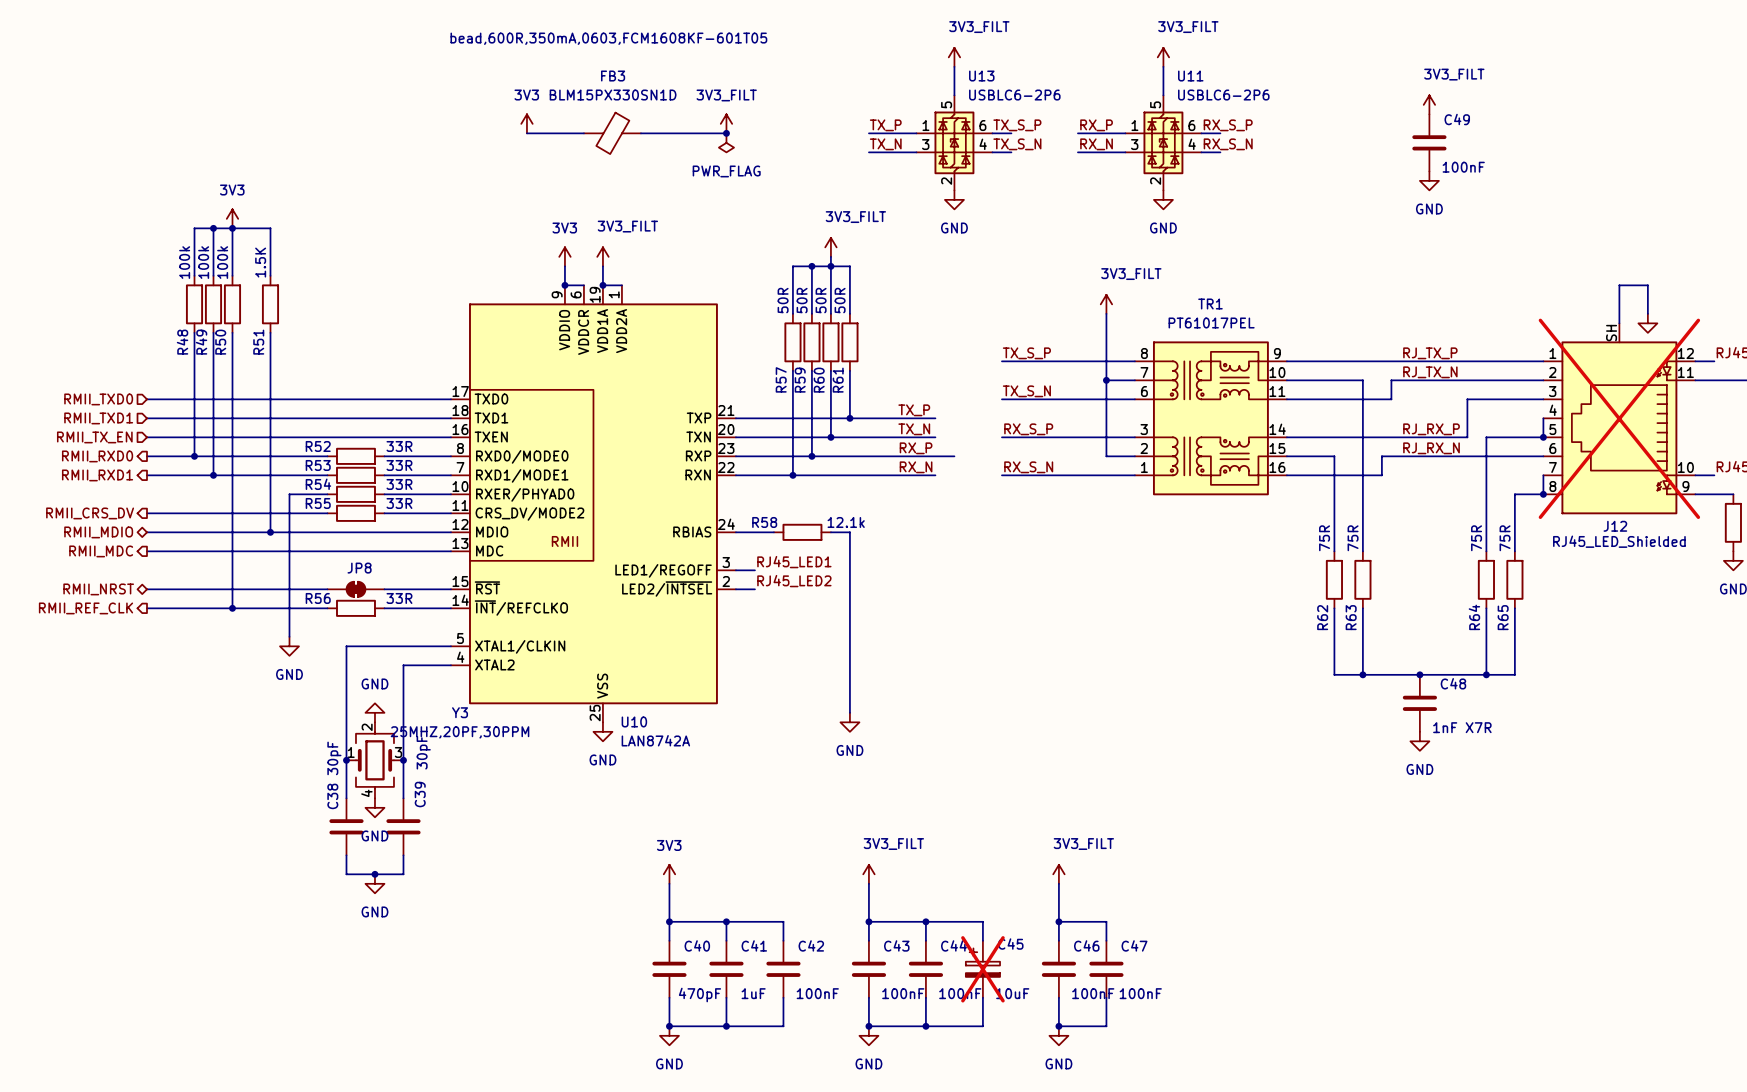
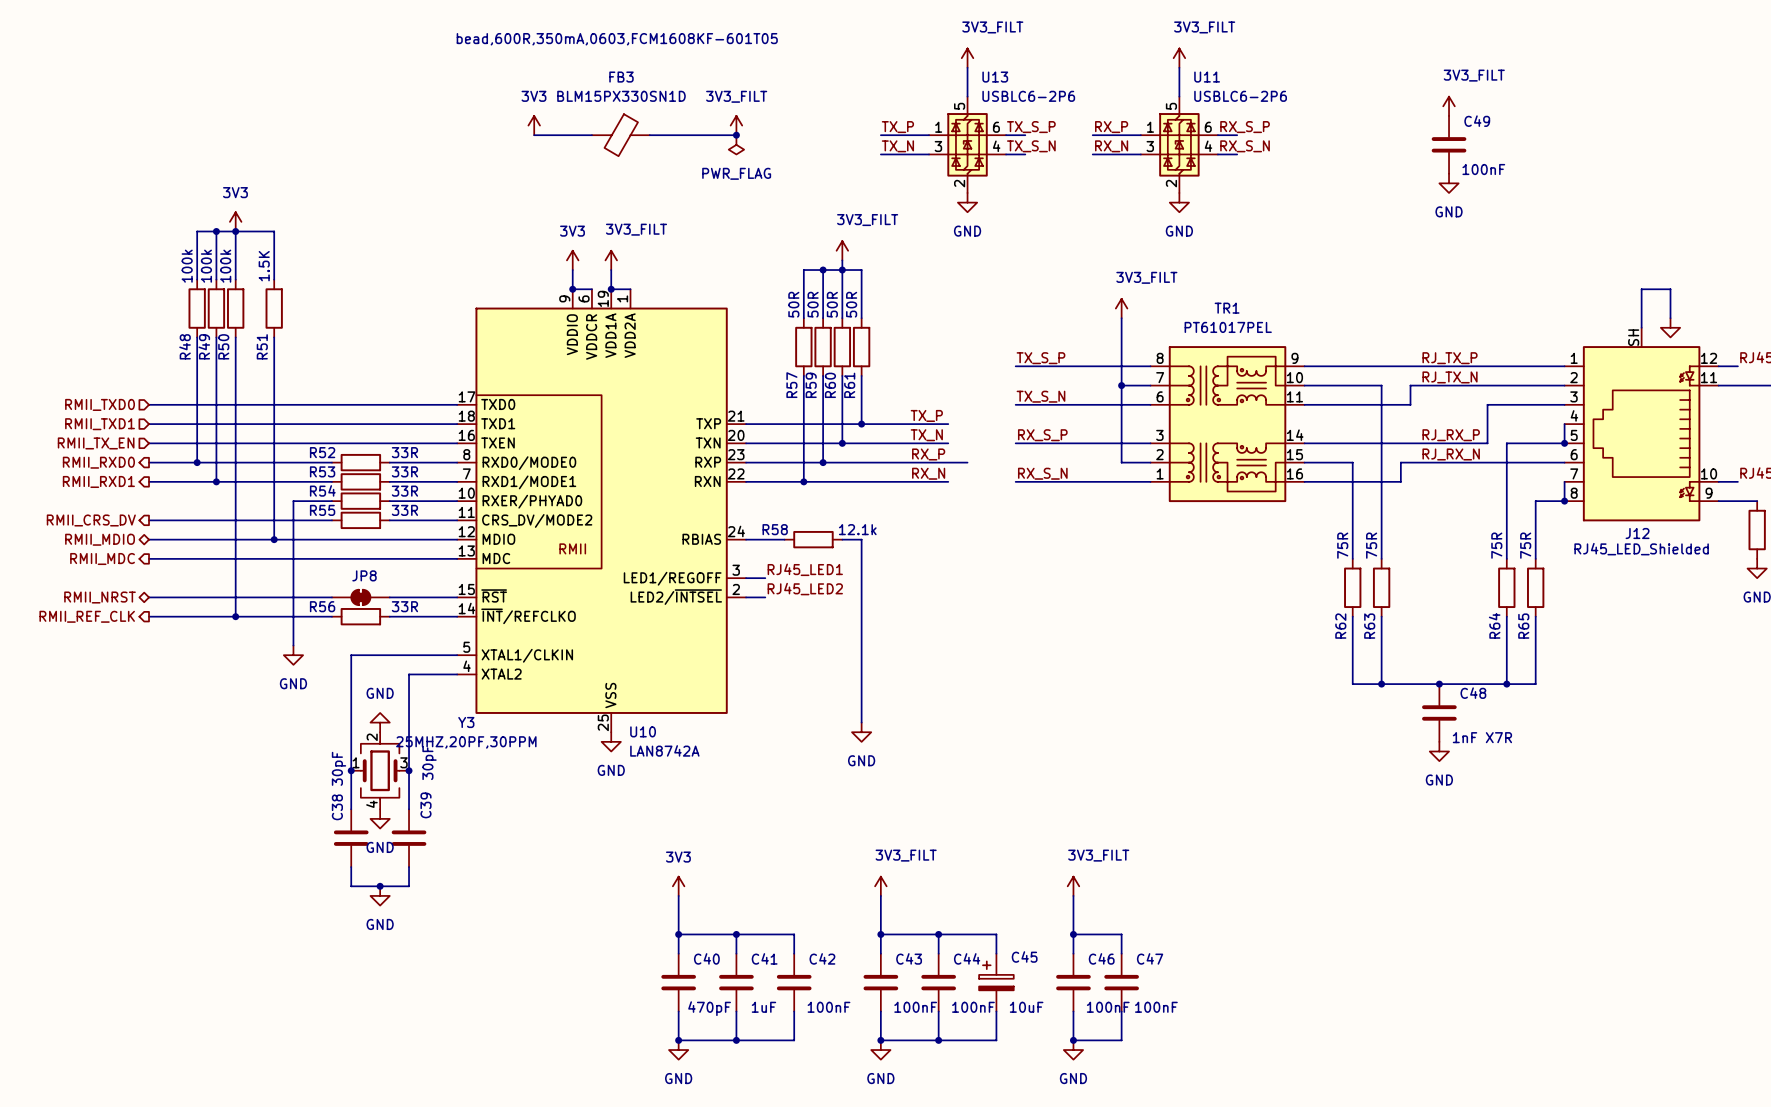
J12 do-not-place cross: (1619, 418) -> none
C45 do-not-place cross: (982, 969) -> none

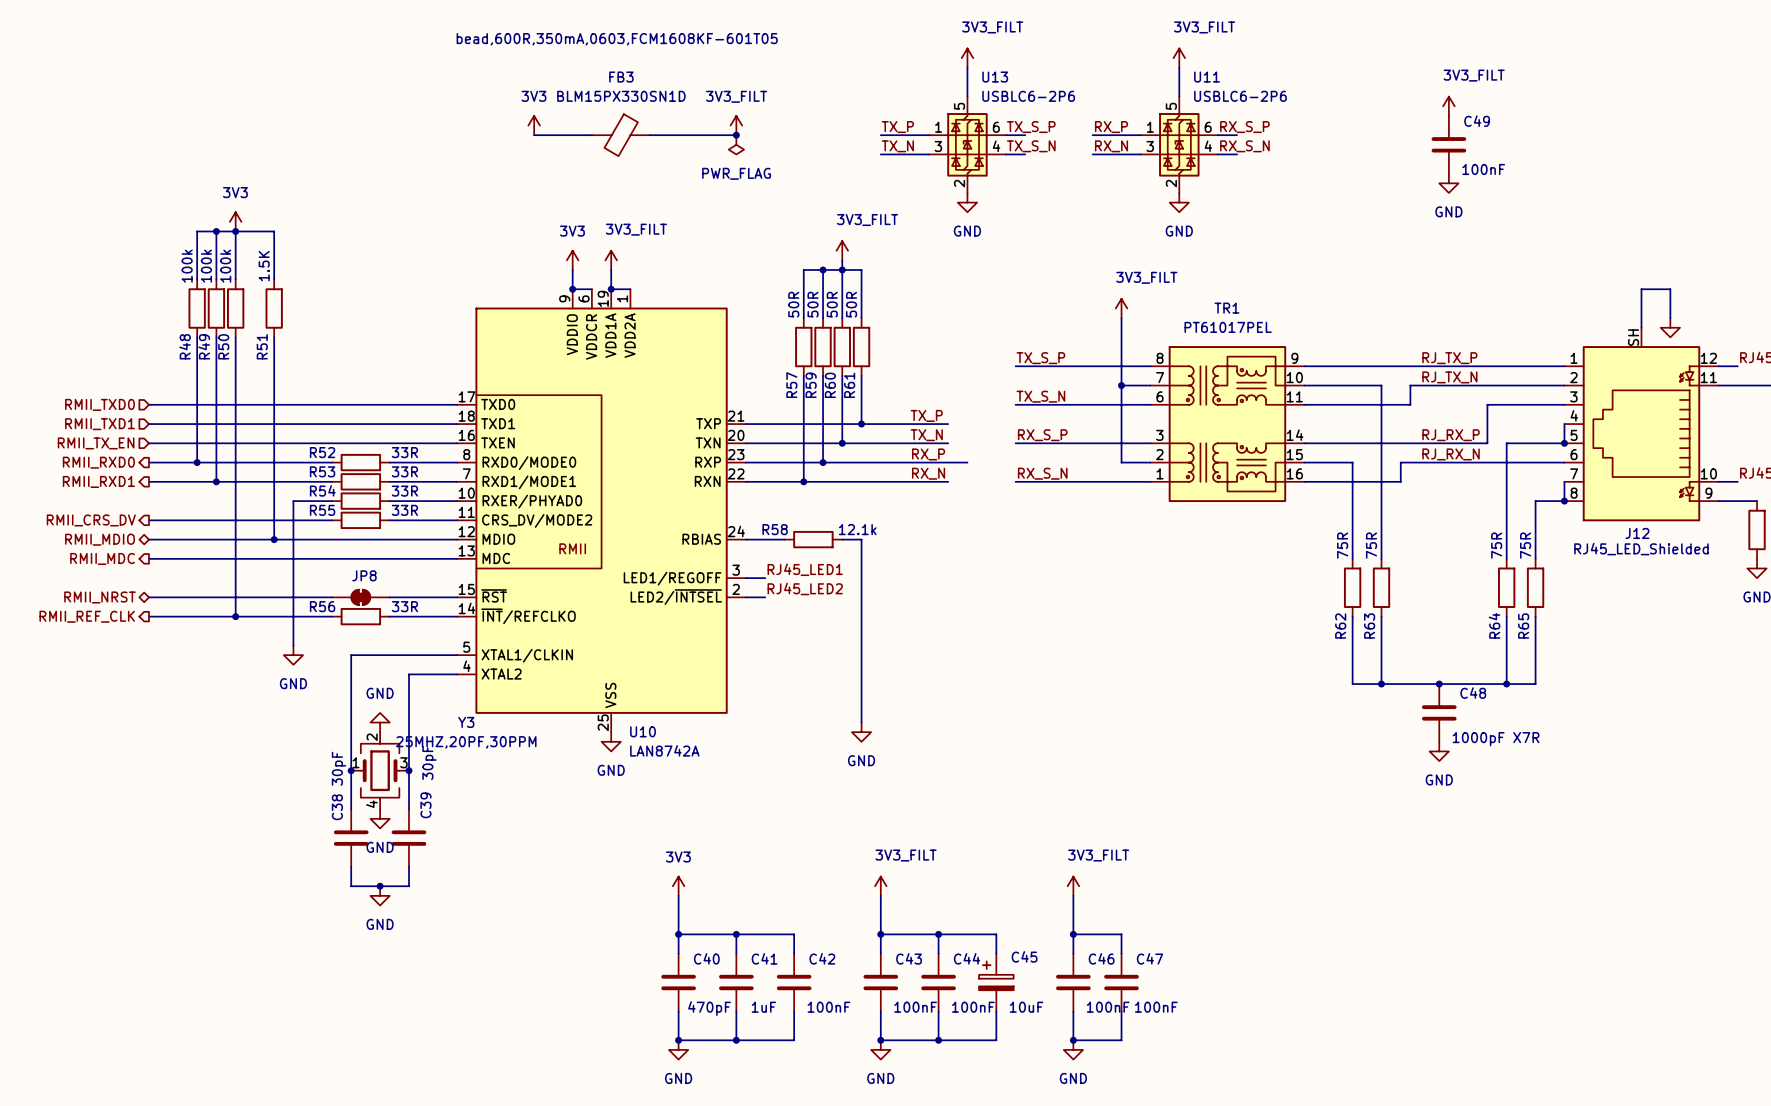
C48 value: 1nF X7R (1482, 737) -> 1000pF X7R (1496, 739)

